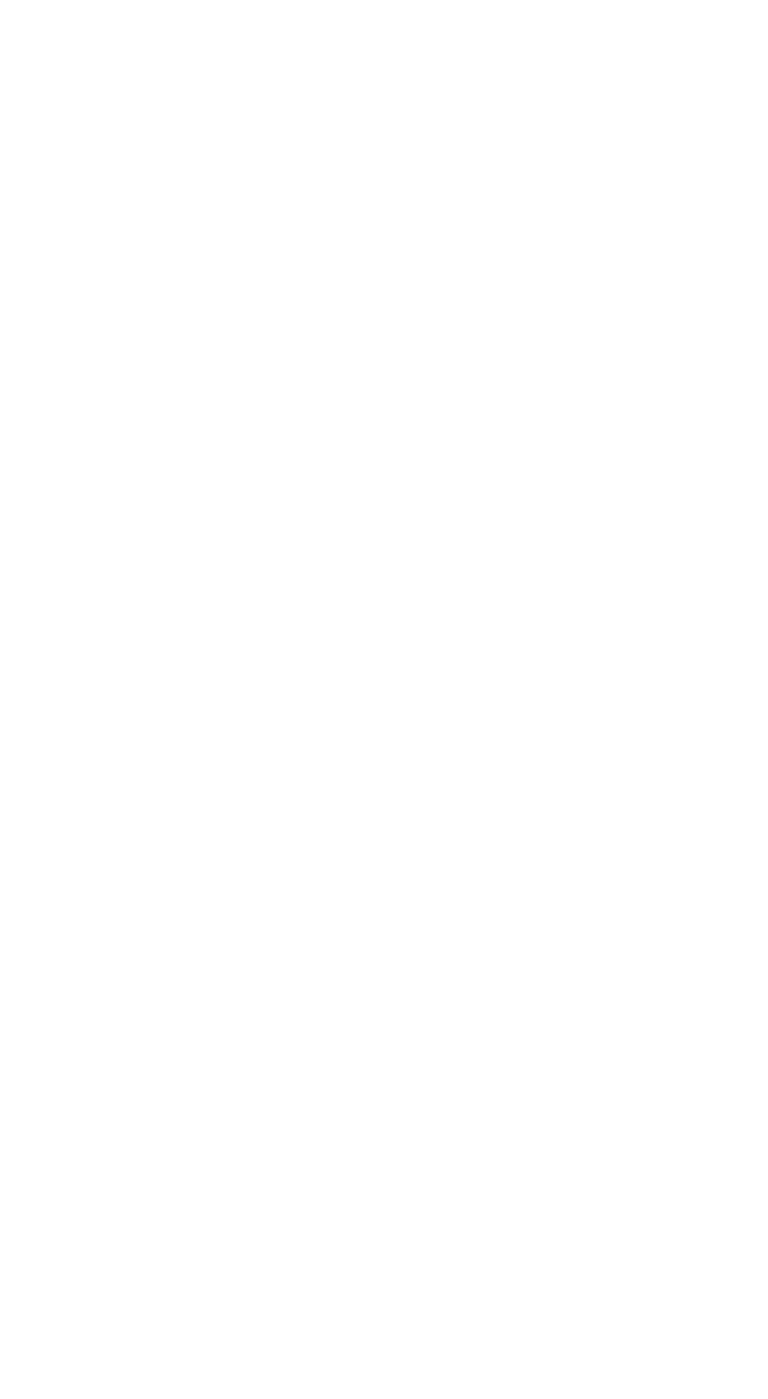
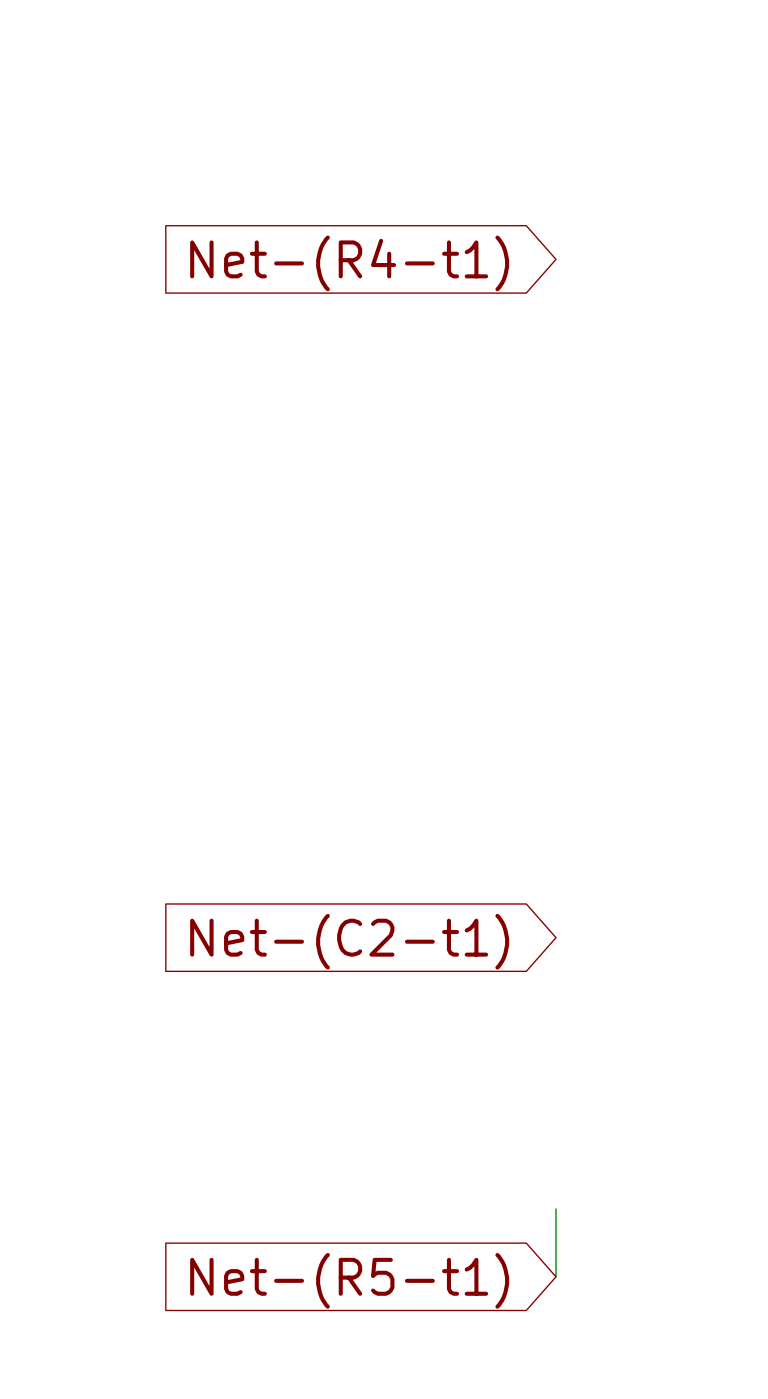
global label: none -> Net-(R4-t1) (349, 263)
global label: none -> Net-(C2-t1) (349, 941)
wire: none -> (555, 1208) (555, 1276)
global label: none -> Net-(R5-t1) (349, 1280)

